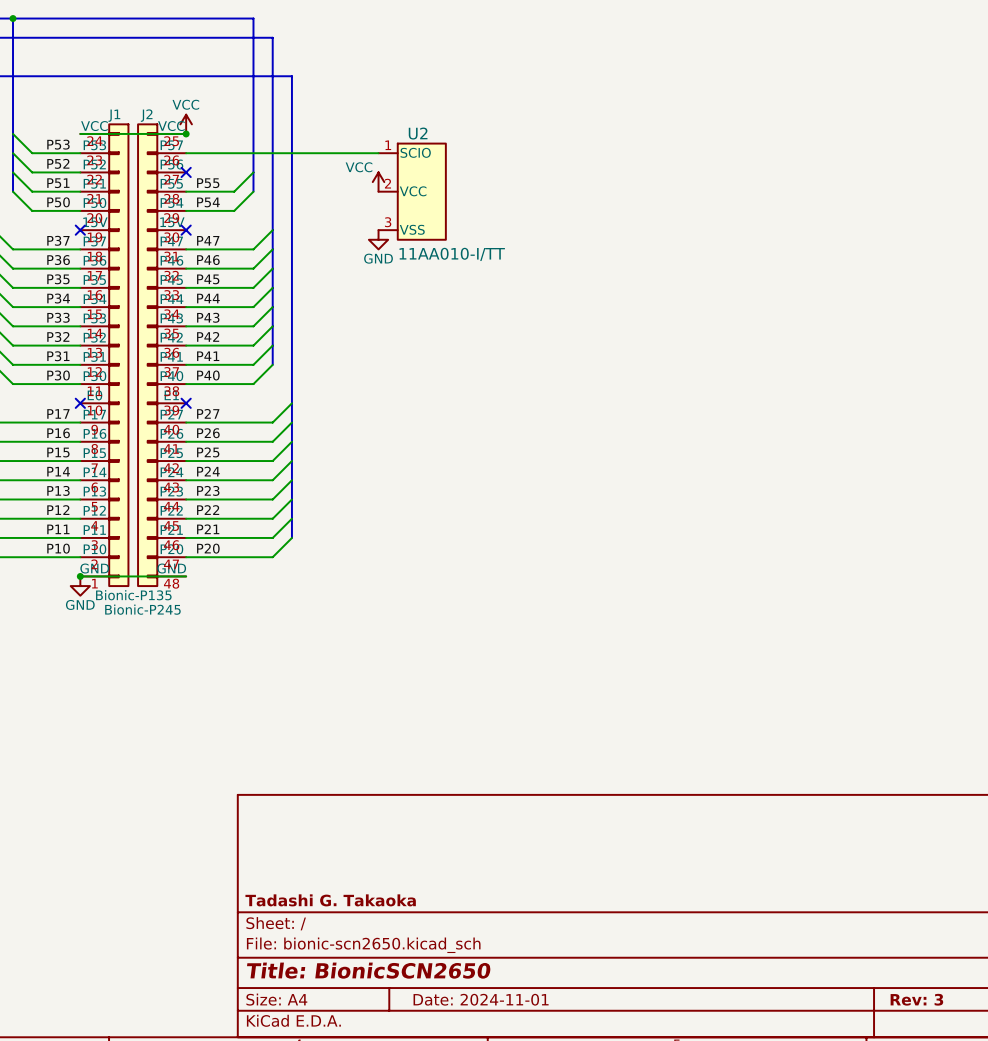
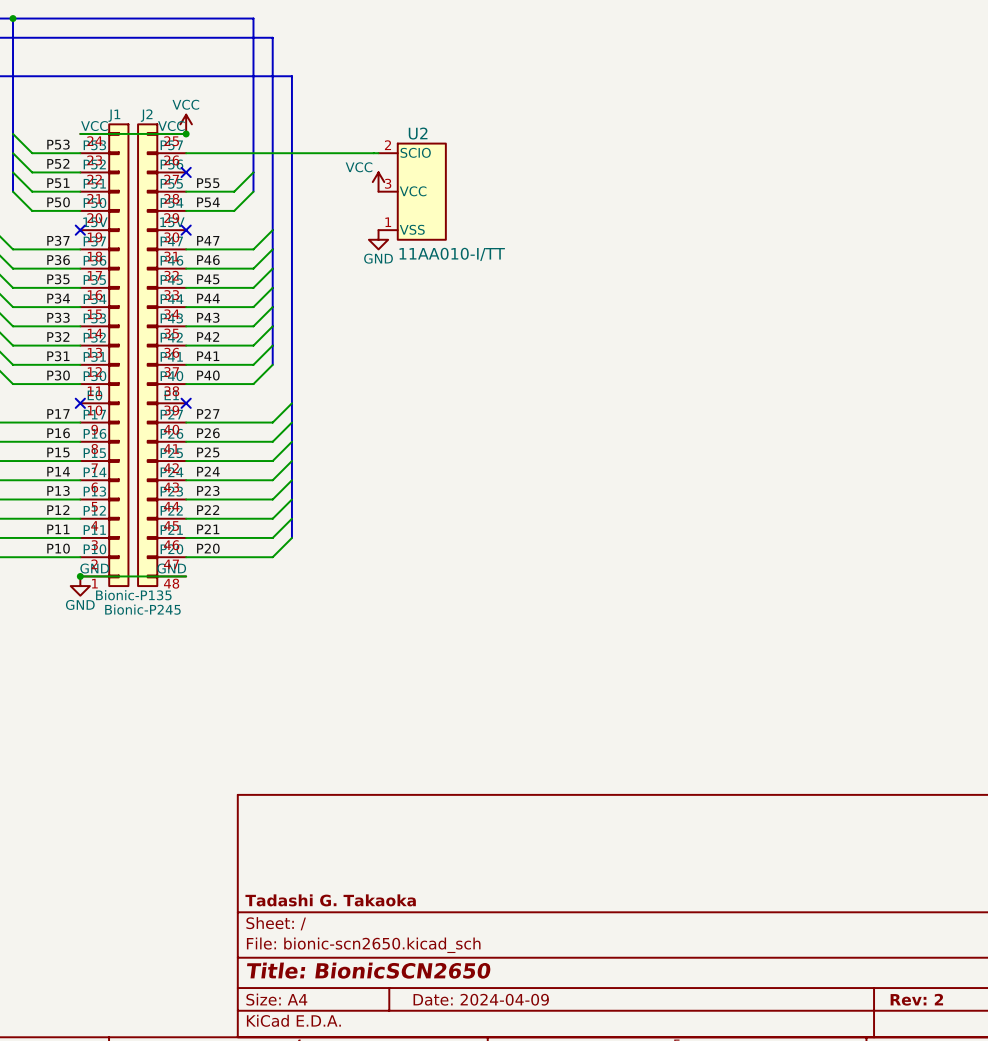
U2 pin number: 1 (388, 145) -> 2 (387, 145)
U2 pin number: 2 (387, 183) -> 3 (388, 183)
U2 pin number: 3 (388, 222) -> 1 (388, 222)
title block: Date: 2024-11-01 (481, 999) -> Date: 2024-04-09 (481, 999)
title block: Rev: 3 (916, 999) -> Rev: 2 (916, 999)

